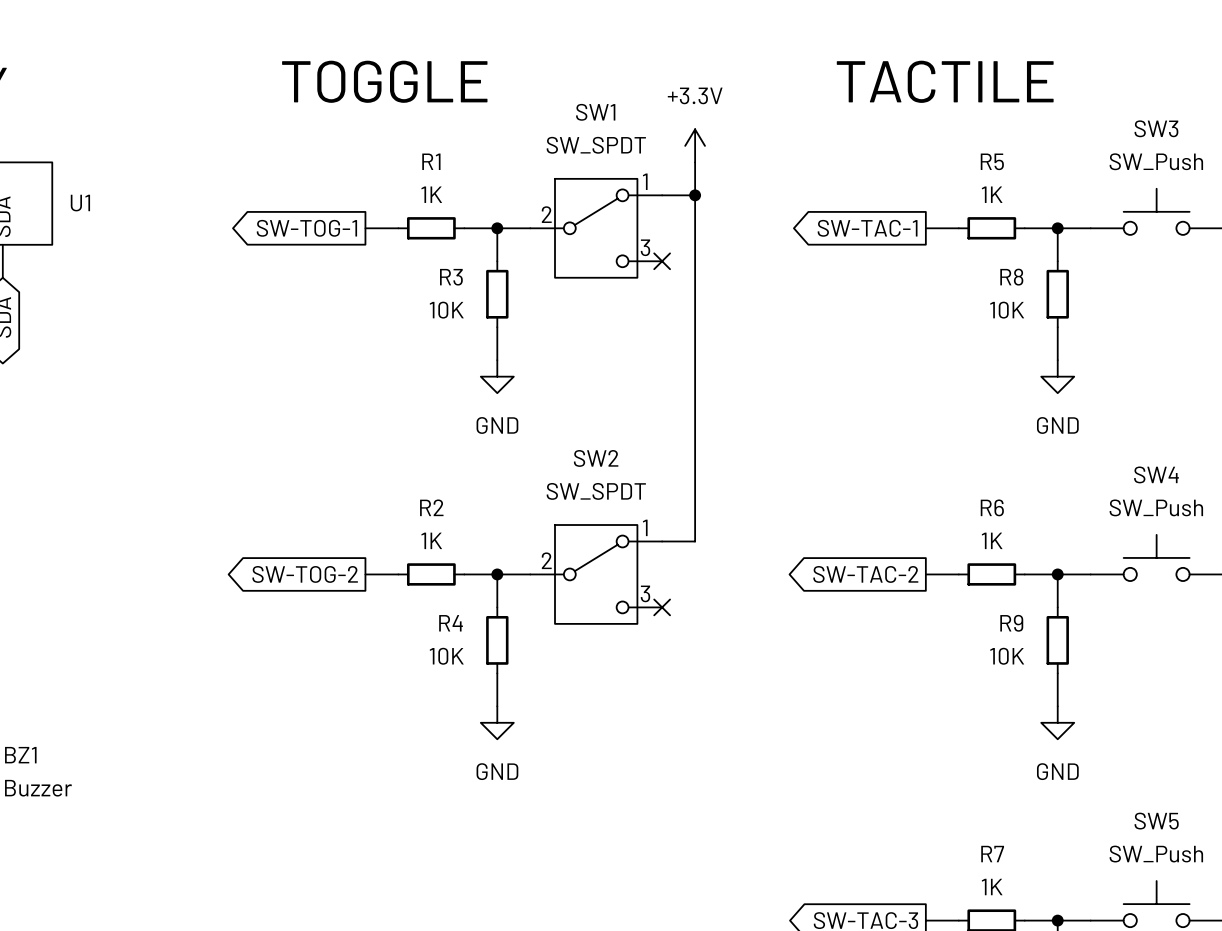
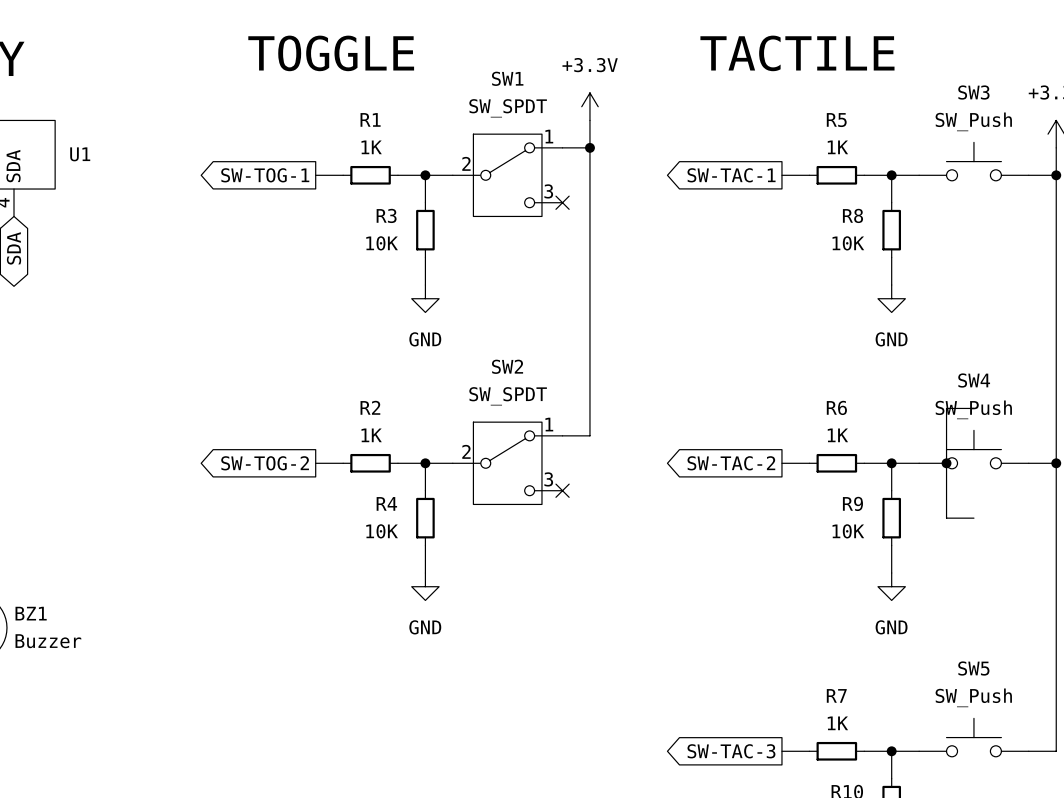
wire: none -> (973, 408) (946, 408) (946, 518) (973, 518)
junction: none -> (946, 463)

